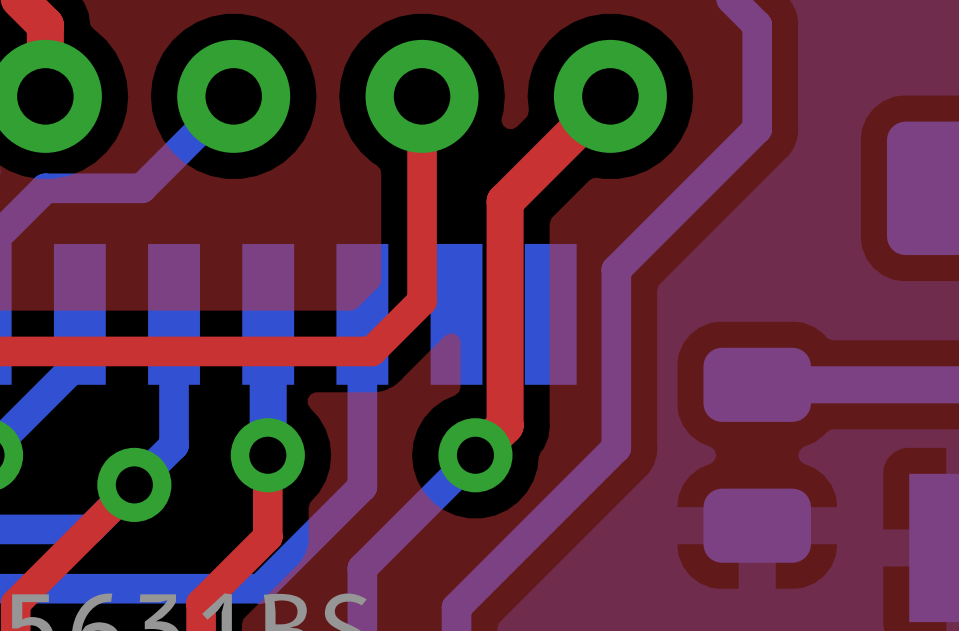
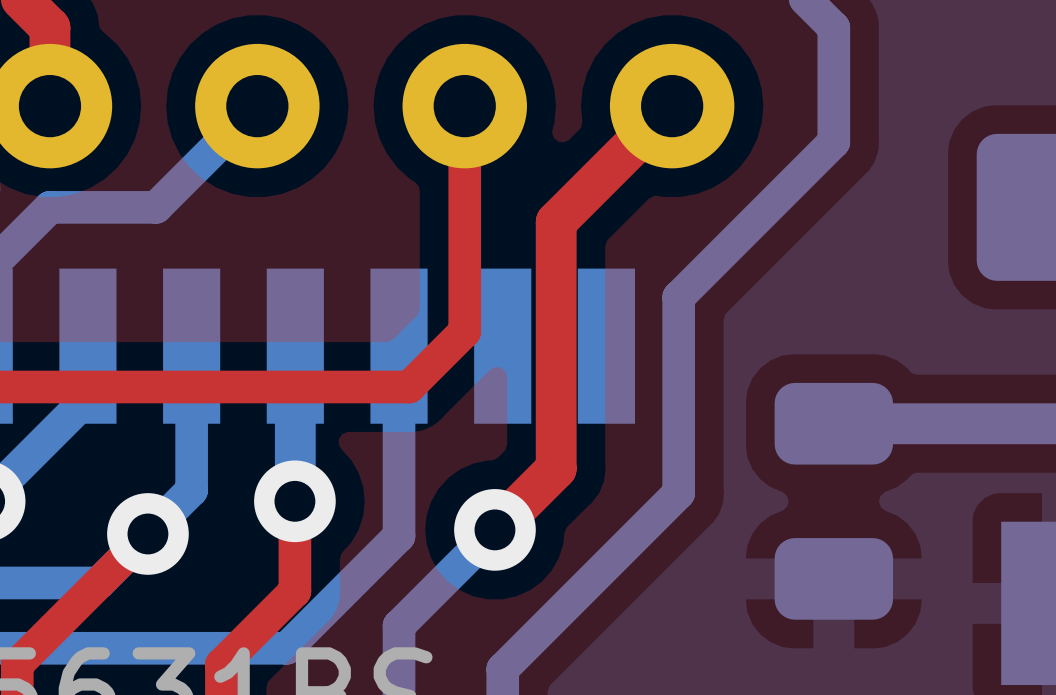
via position: (475, 455) -> (494, 529)

